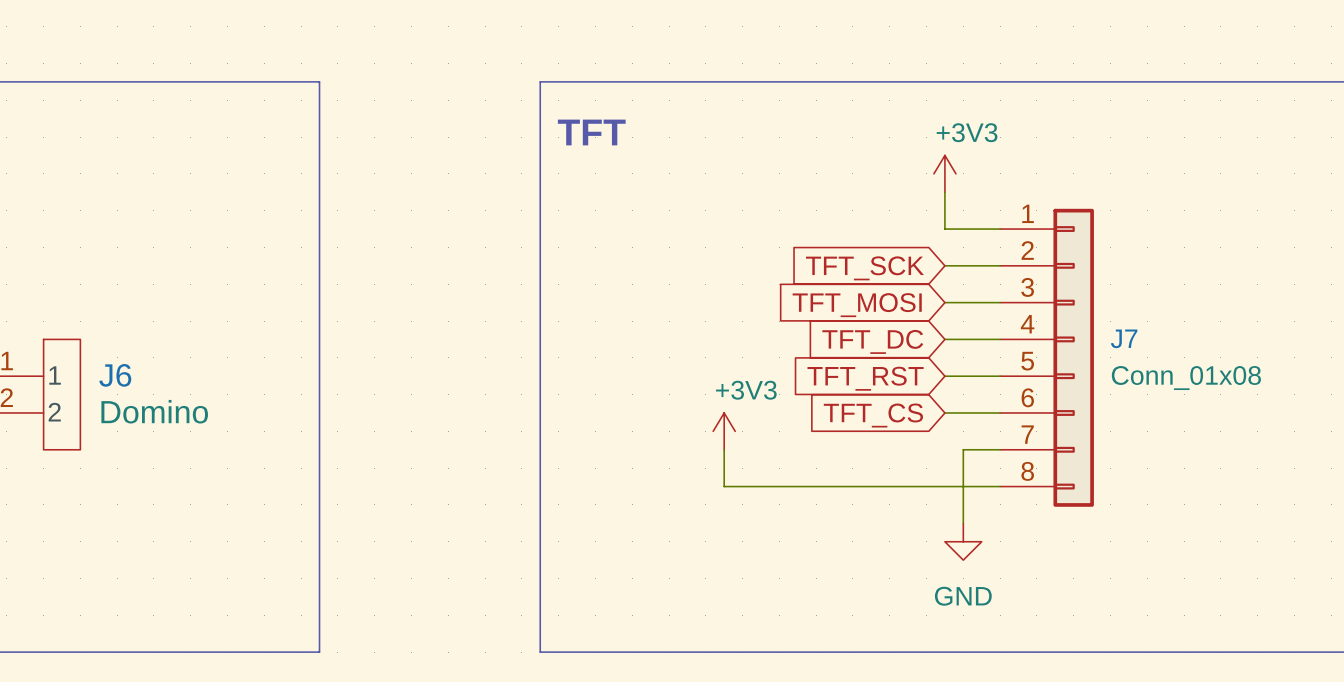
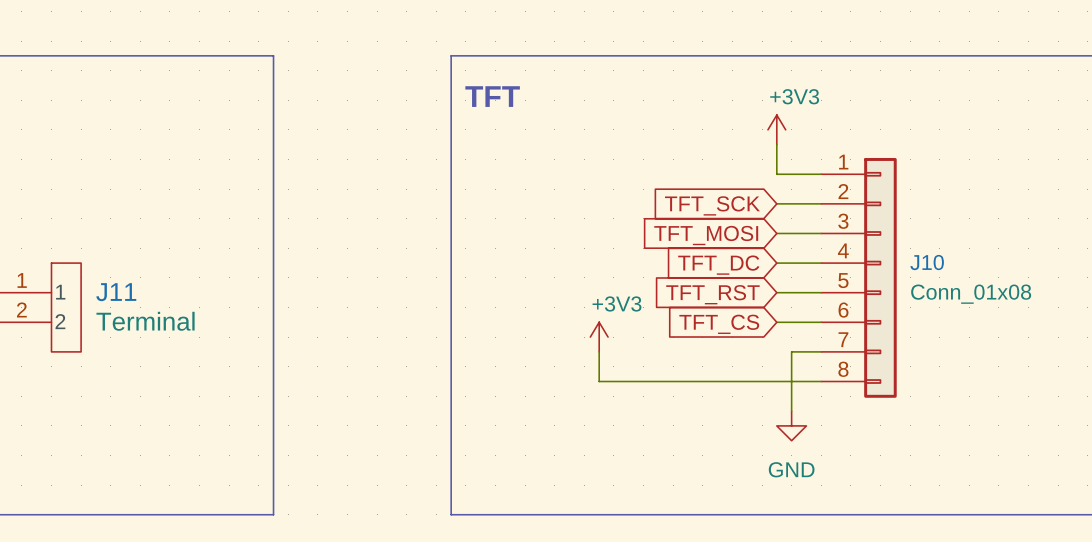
J7 name: J7 (1124, 338) -> J10 (927, 262)
J6 name: J6 (115, 375) -> J11 (116, 292)
J6 value: Domino (154, 411) -> Terminal (145, 321)

